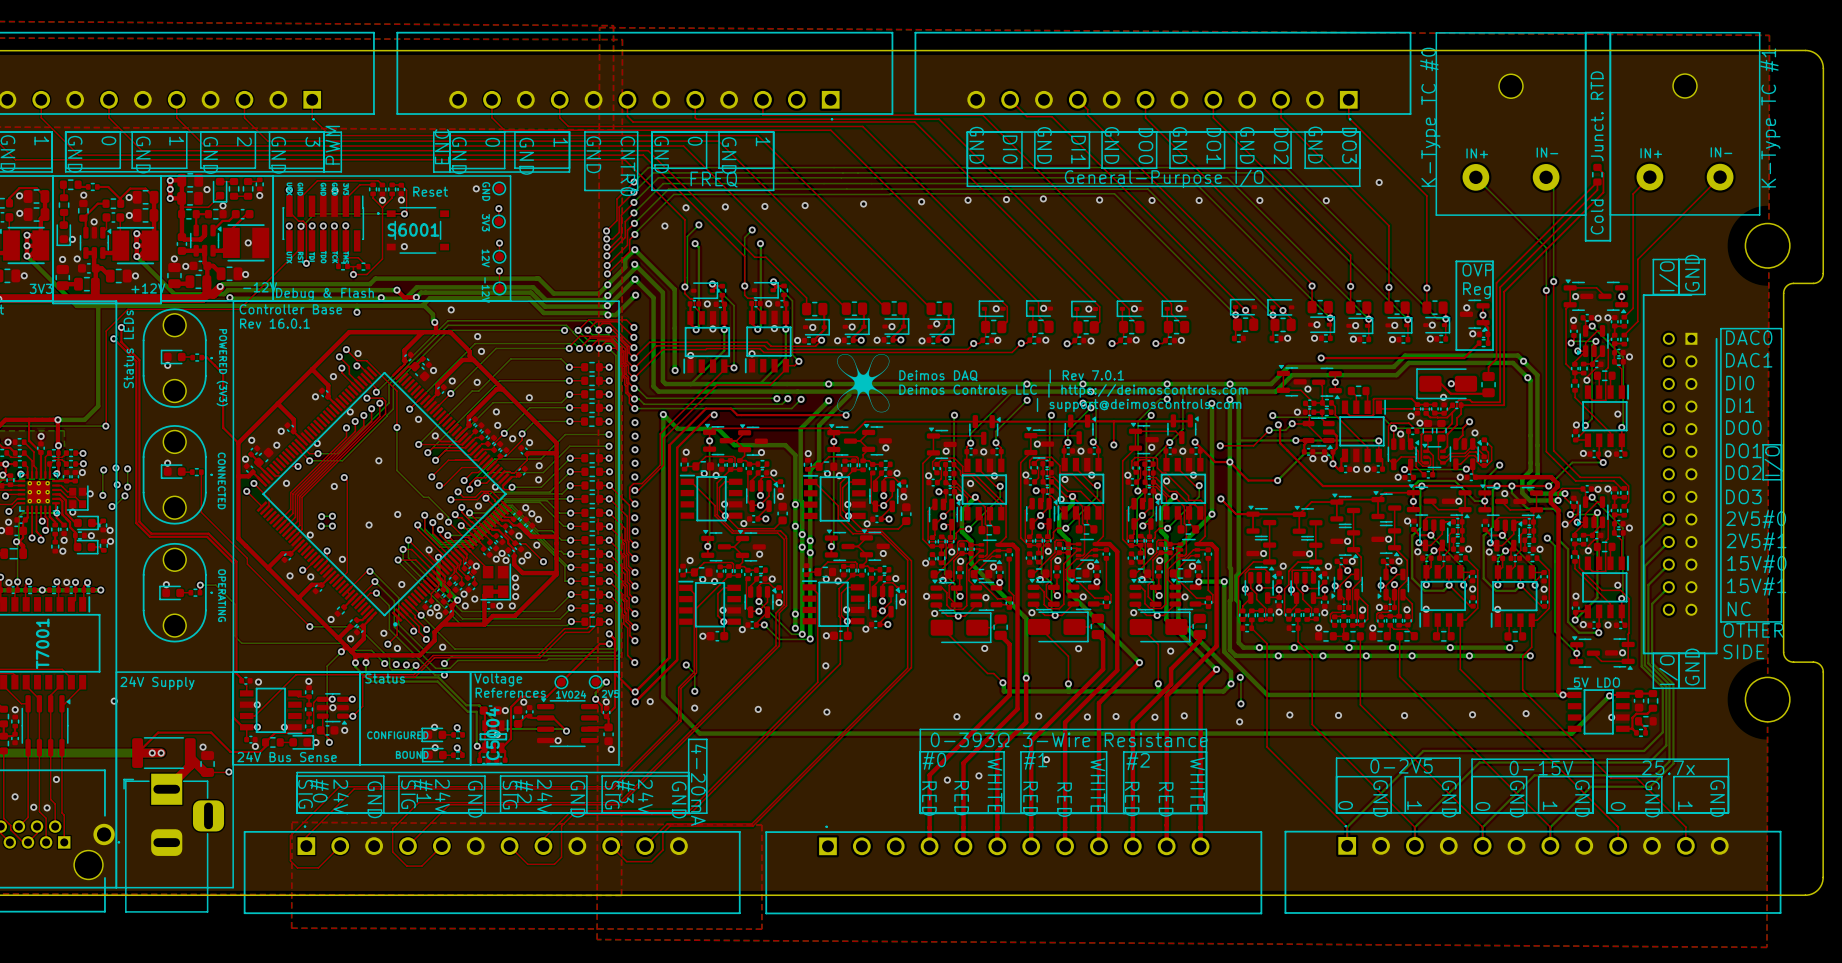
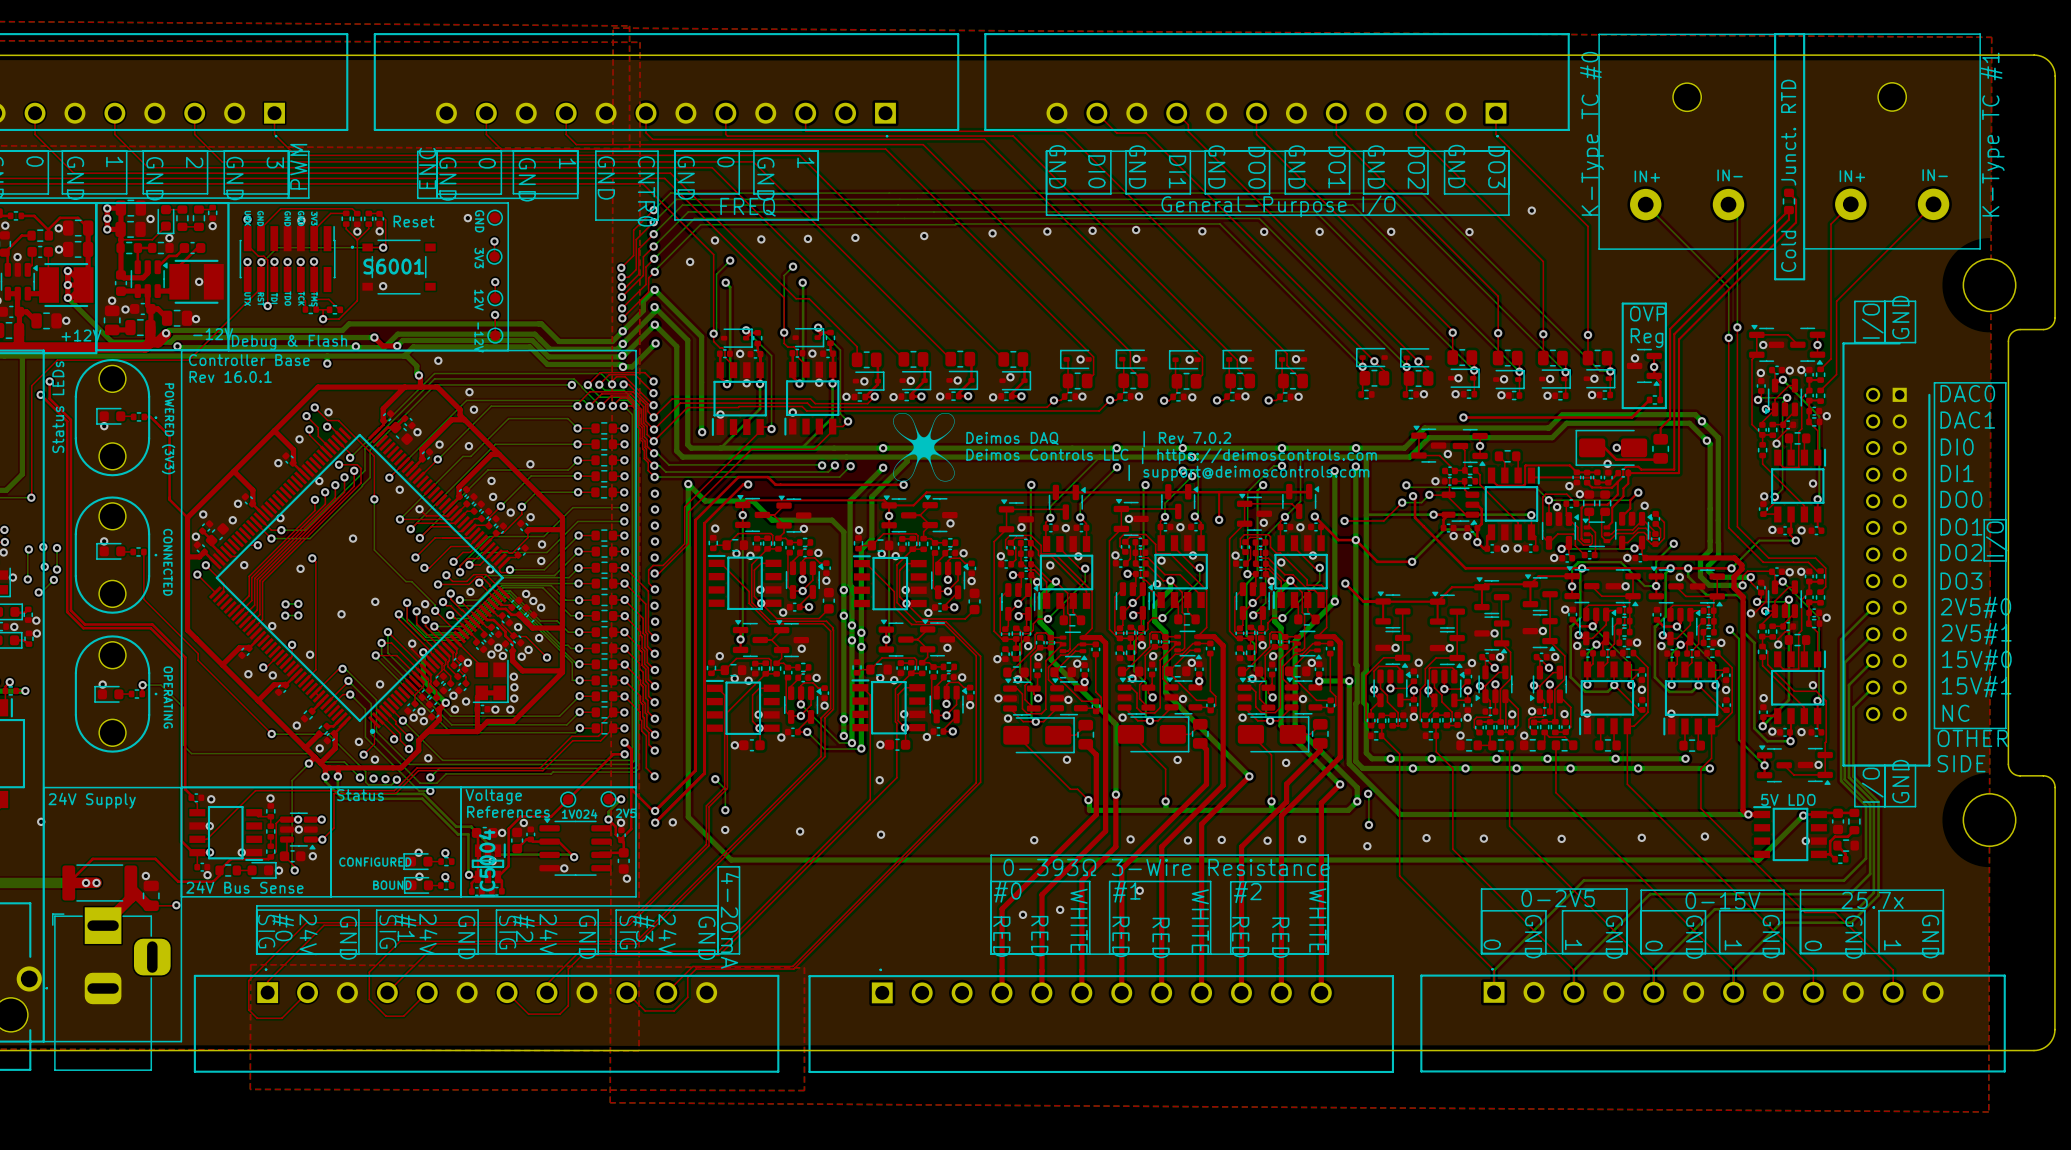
via: (1472, 333) -> none
part: (1483, 334) -> none
text: Deimos DAQ | Rev 7.0.1 (1011, 376) -> Deimos DAQ | Rev 7.0.2 (1098, 439)

